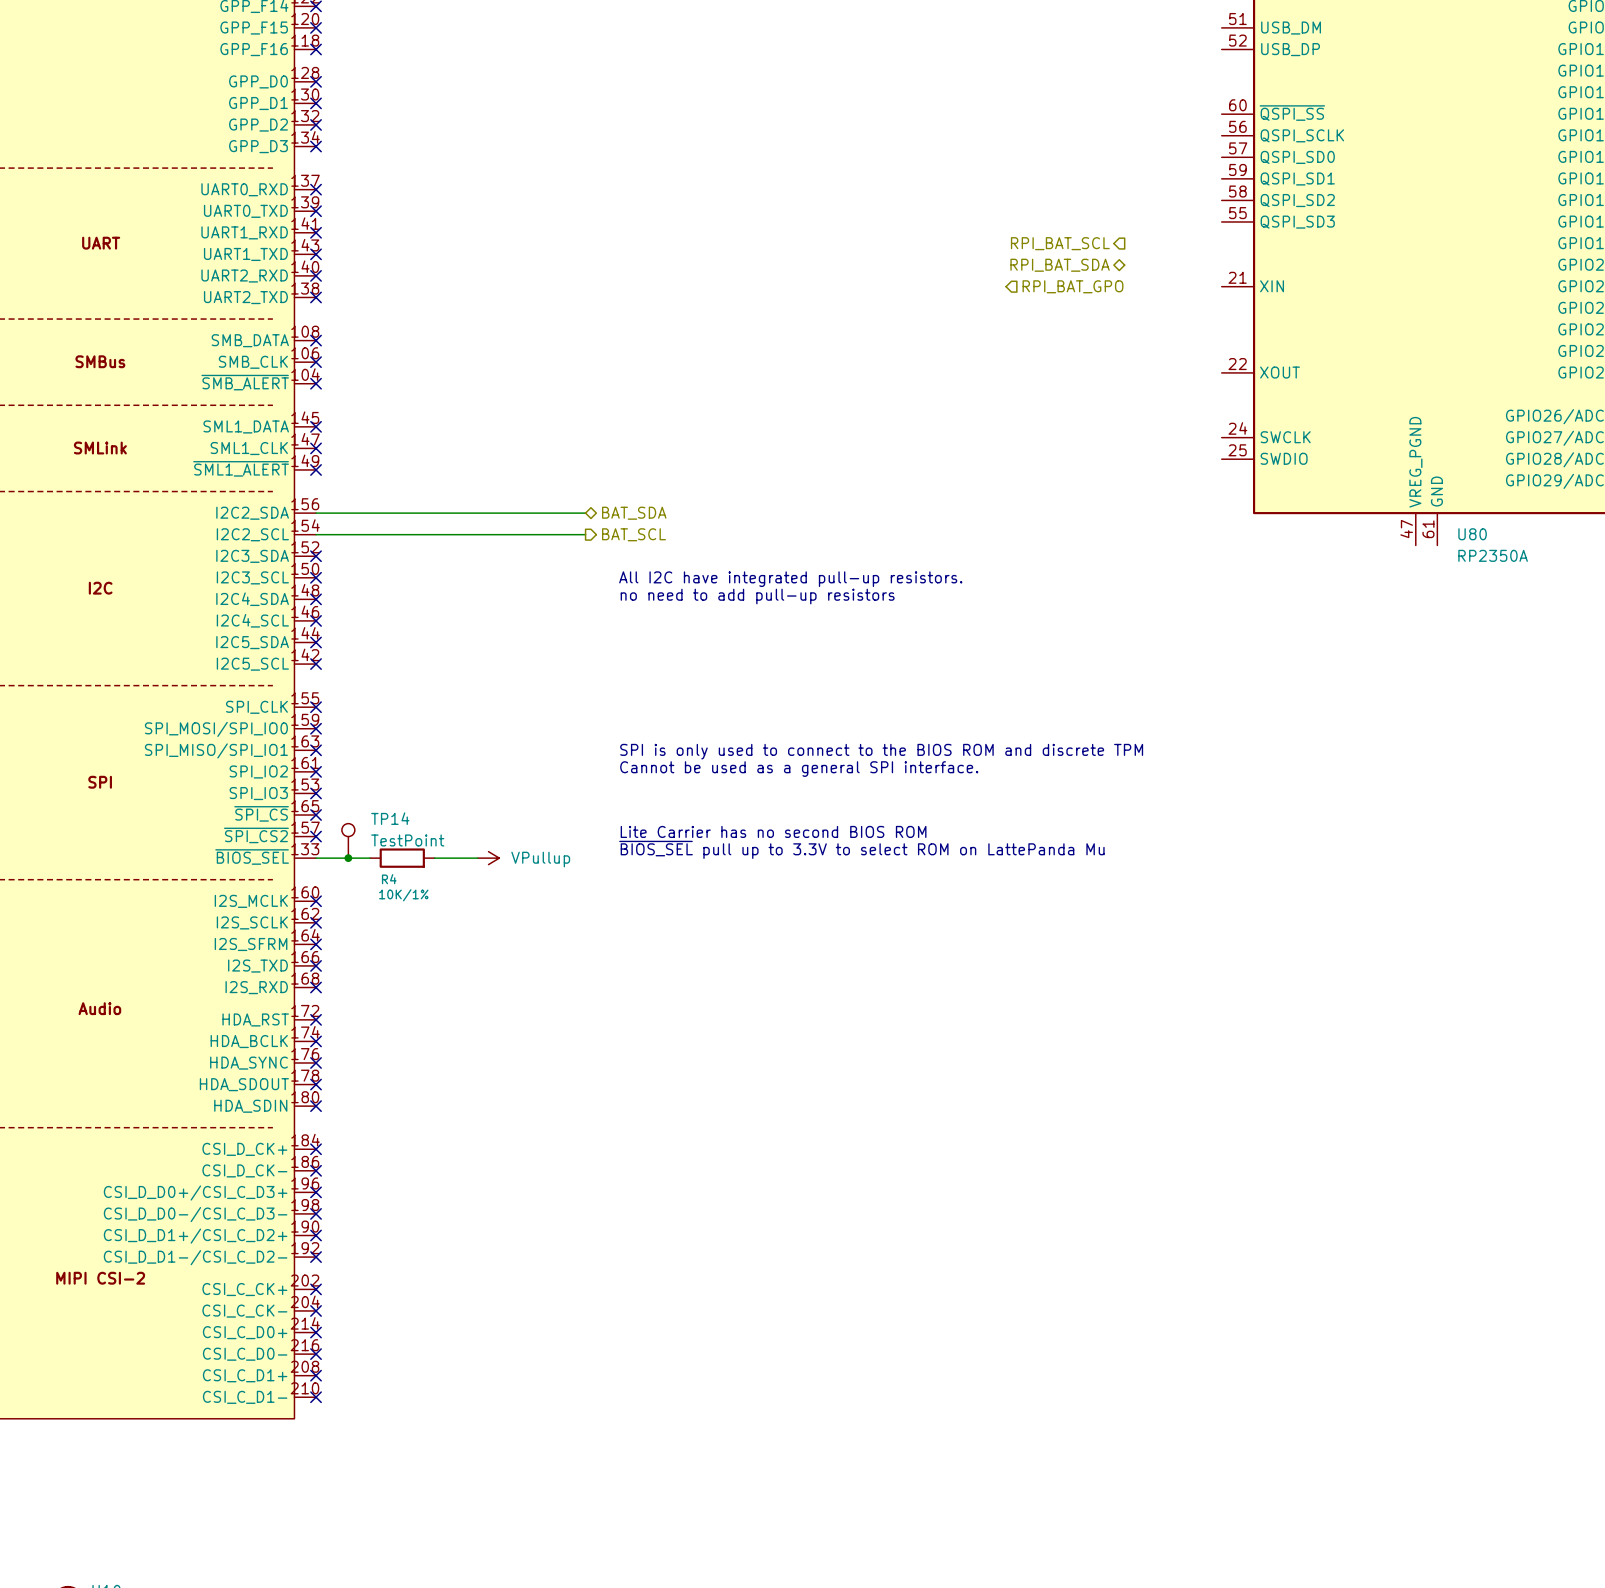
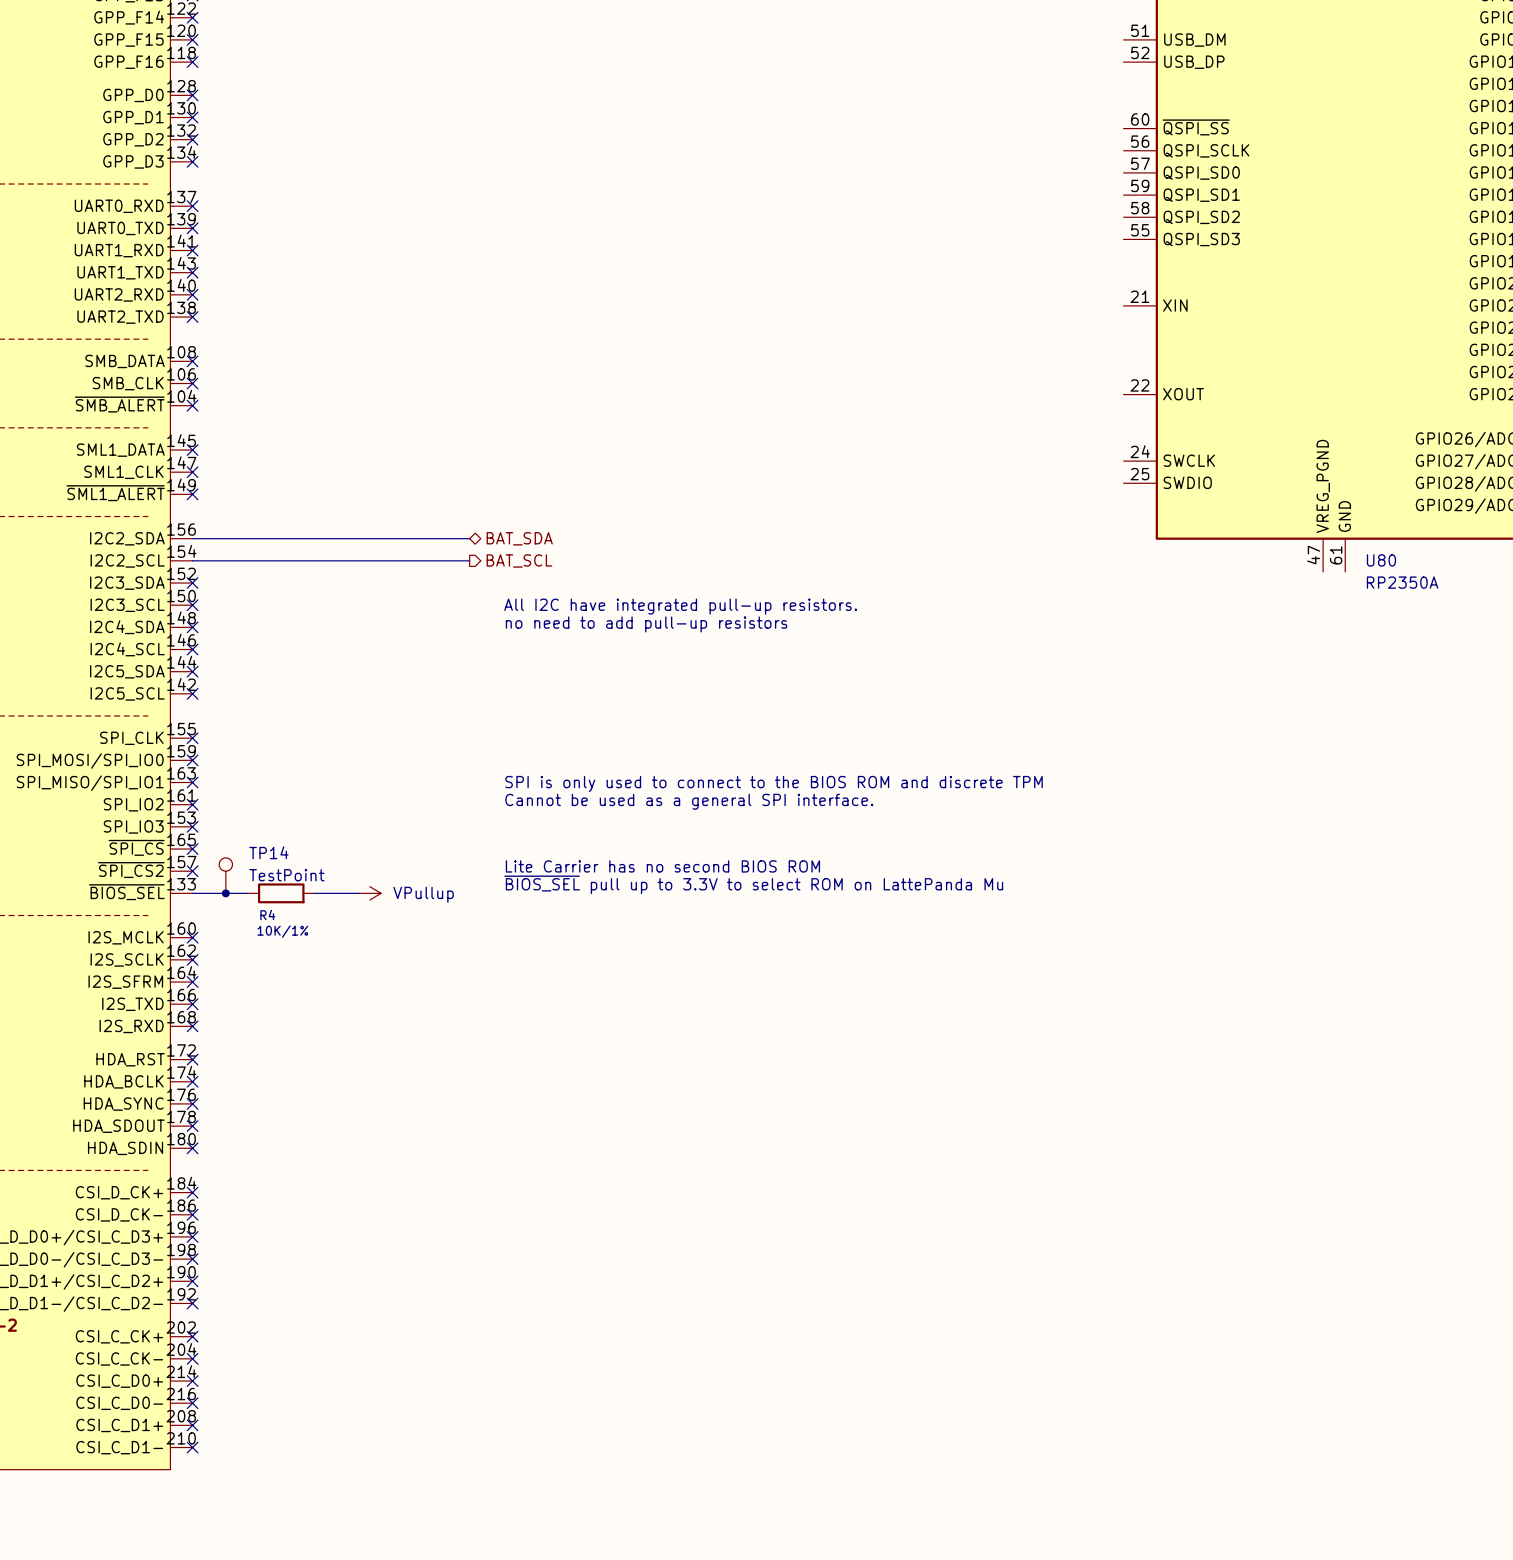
hierarchical label: RPI_BAT_SCL (1060, 243) -> none
hierarchical label: RPI_BAT_SDA (1060, 265) -> none
hierarchical label: RPI_BAT_GPO (1072, 286) -> none

